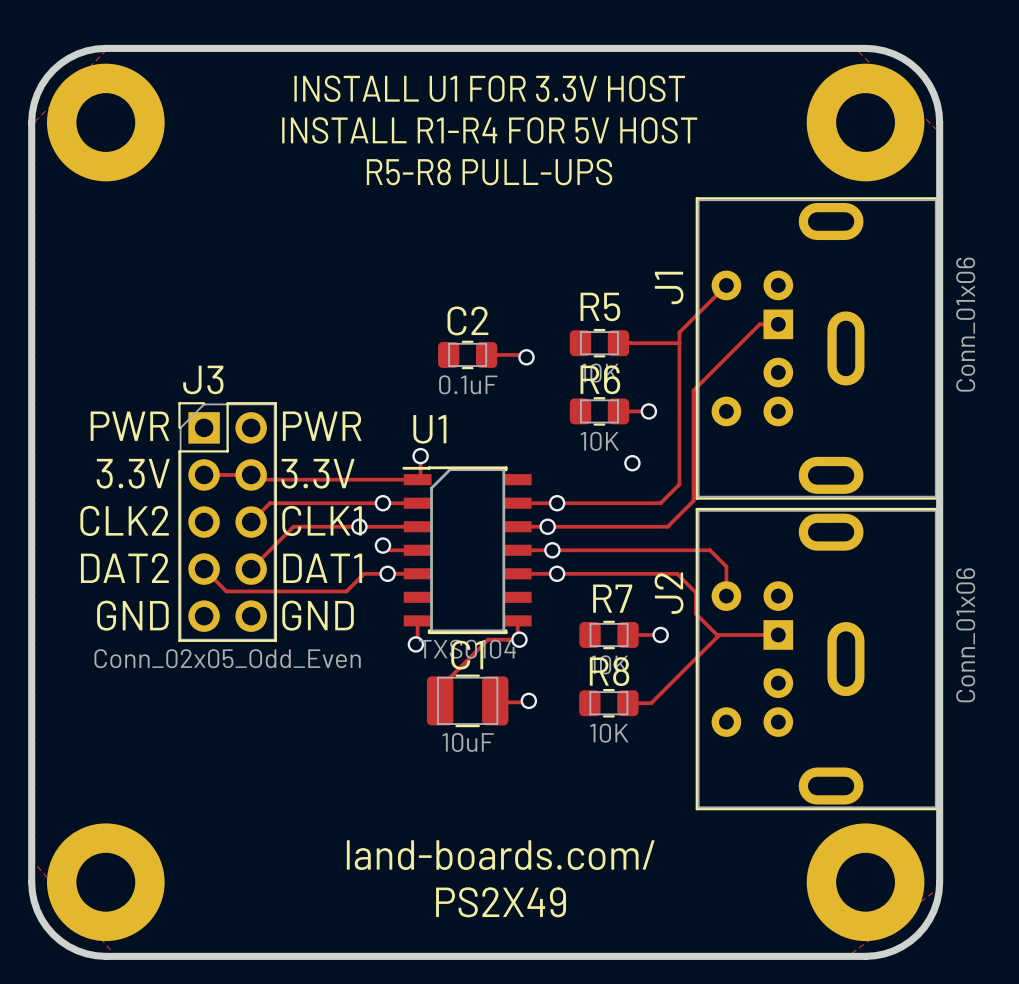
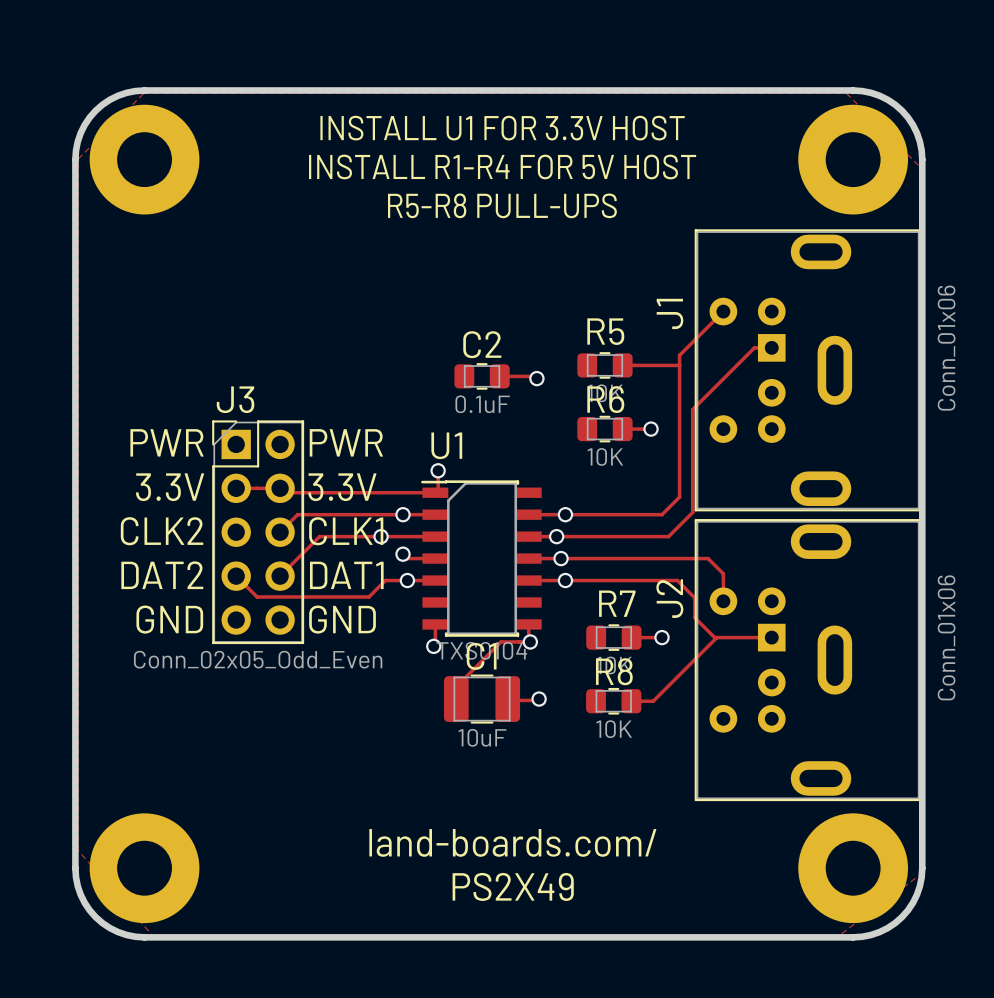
via: (632, 463) -> none

